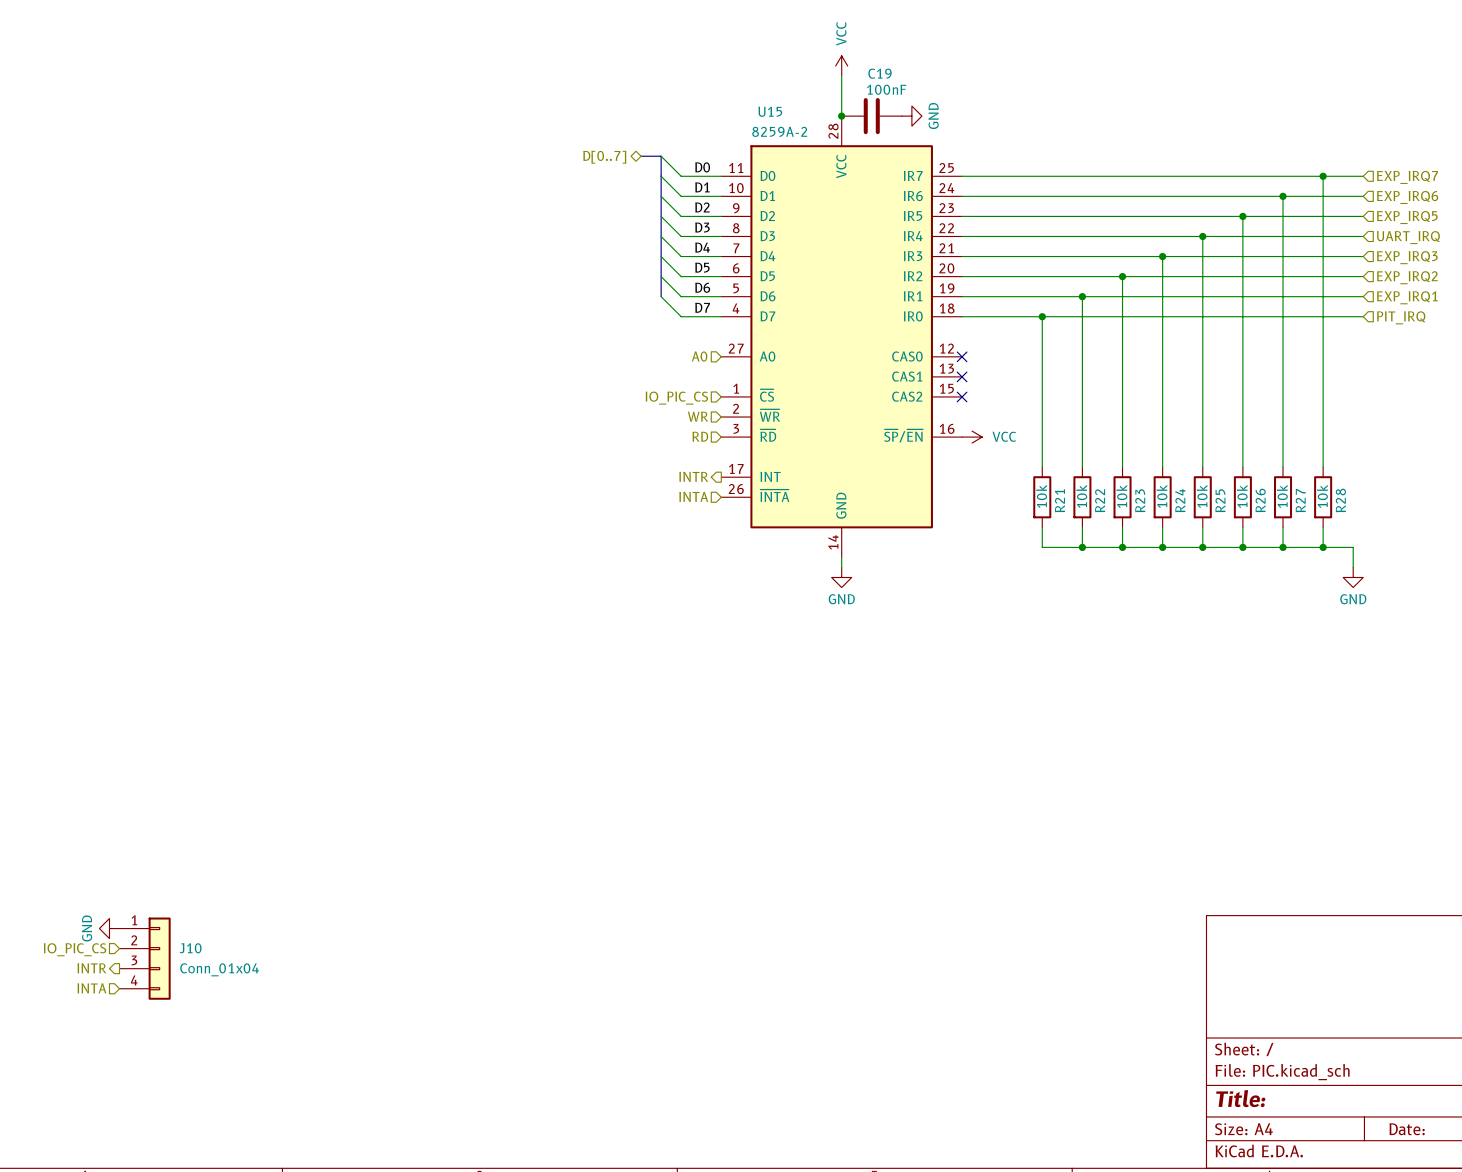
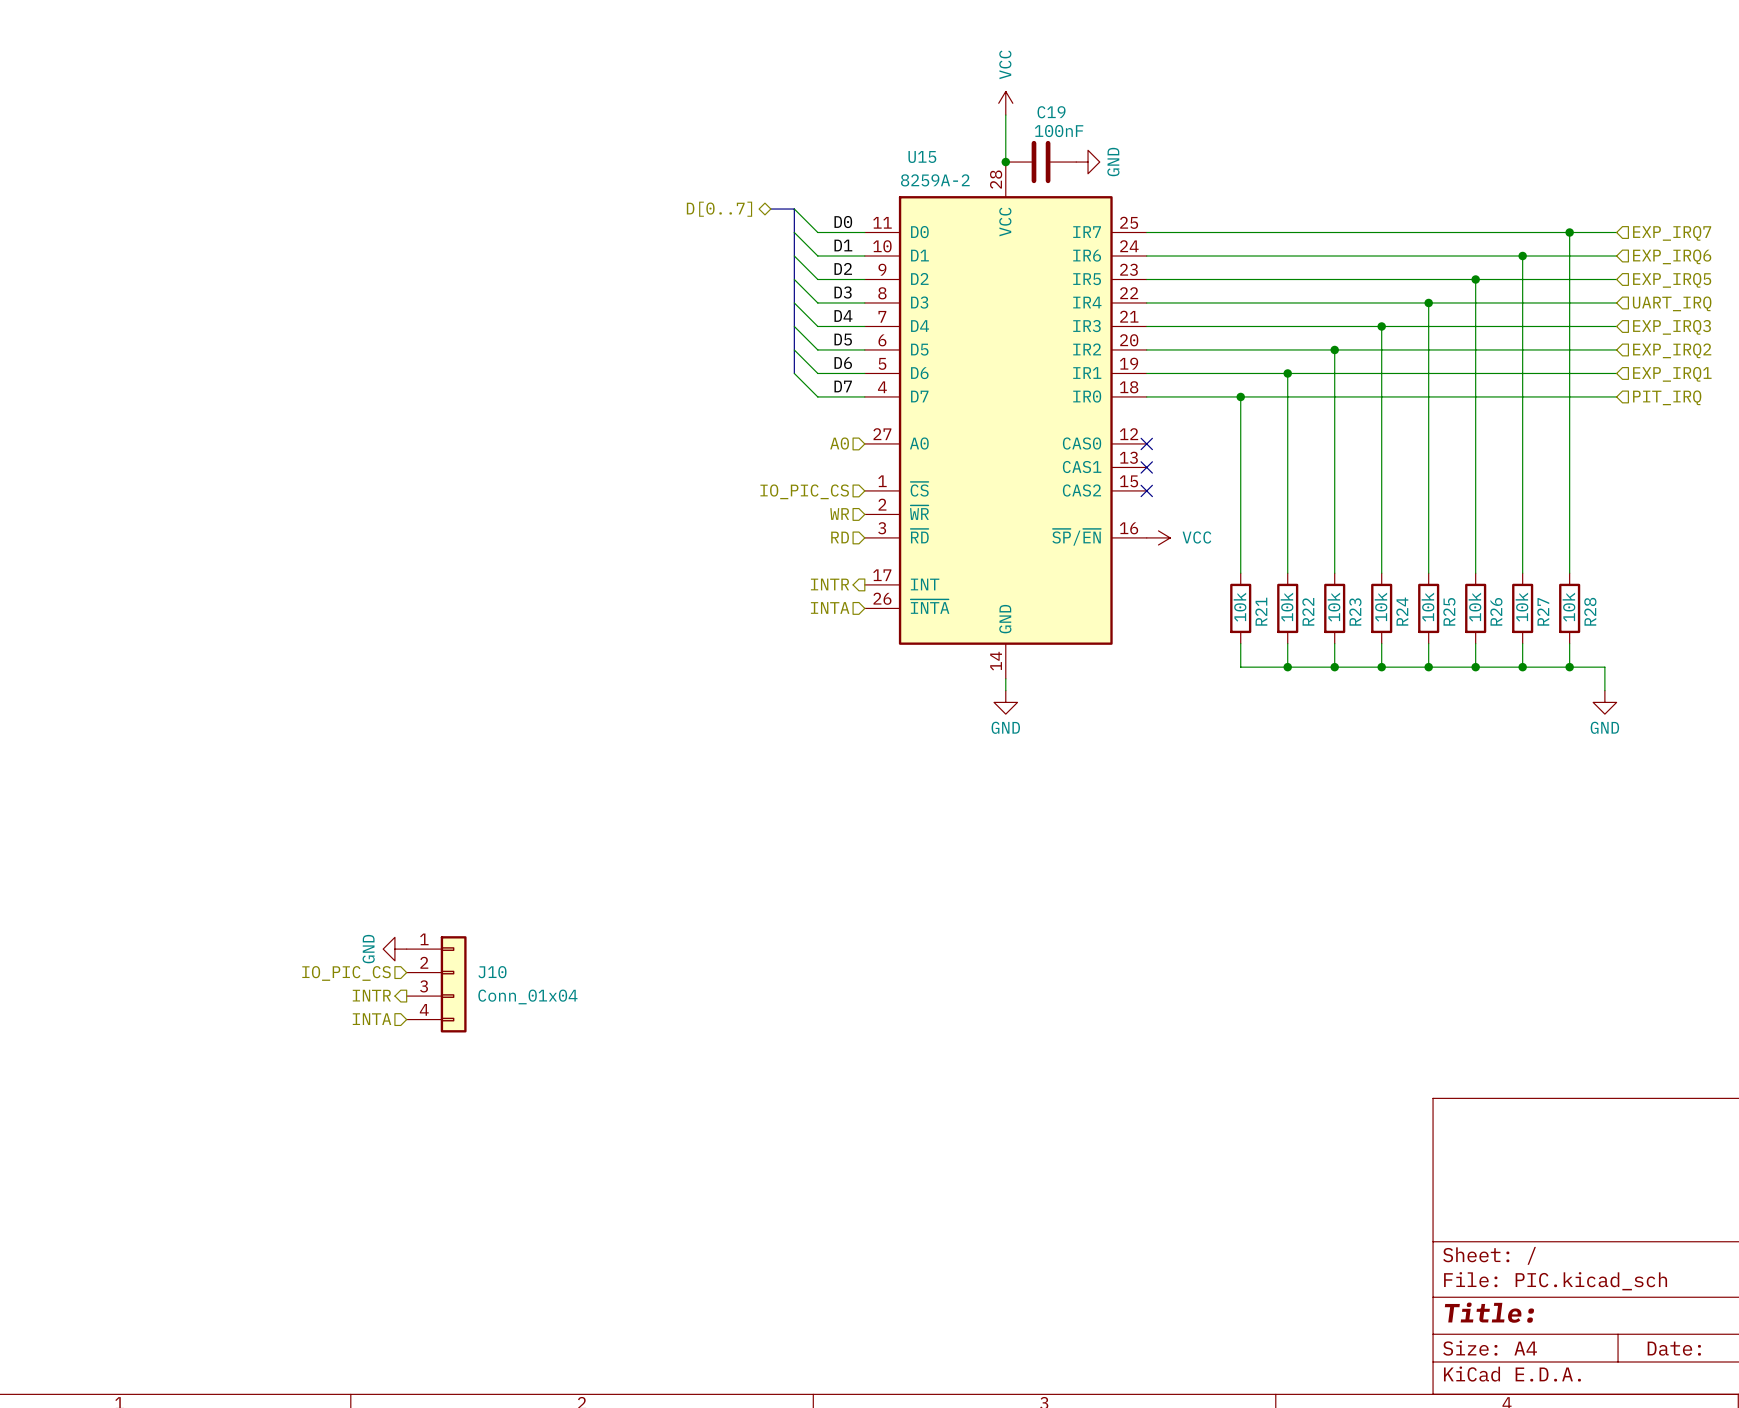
power symbol: none -> GND (394, 949)
hierarchical label: none -> IO_PIC_CS (346, 973)
hierarchical label: none -> INTR (371, 995)
hierarchical label: none -> INTA (372, 1019)
power symbol: GND (109, 928) -> none
hierarchical label: IO_PIC_CS (75, 949) -> none
J10 position: (145, 958) -> (436, 984)
hierarchical label: INTR (91, 968) -> none
hierarchical label: INTA (91, 988) -> none

